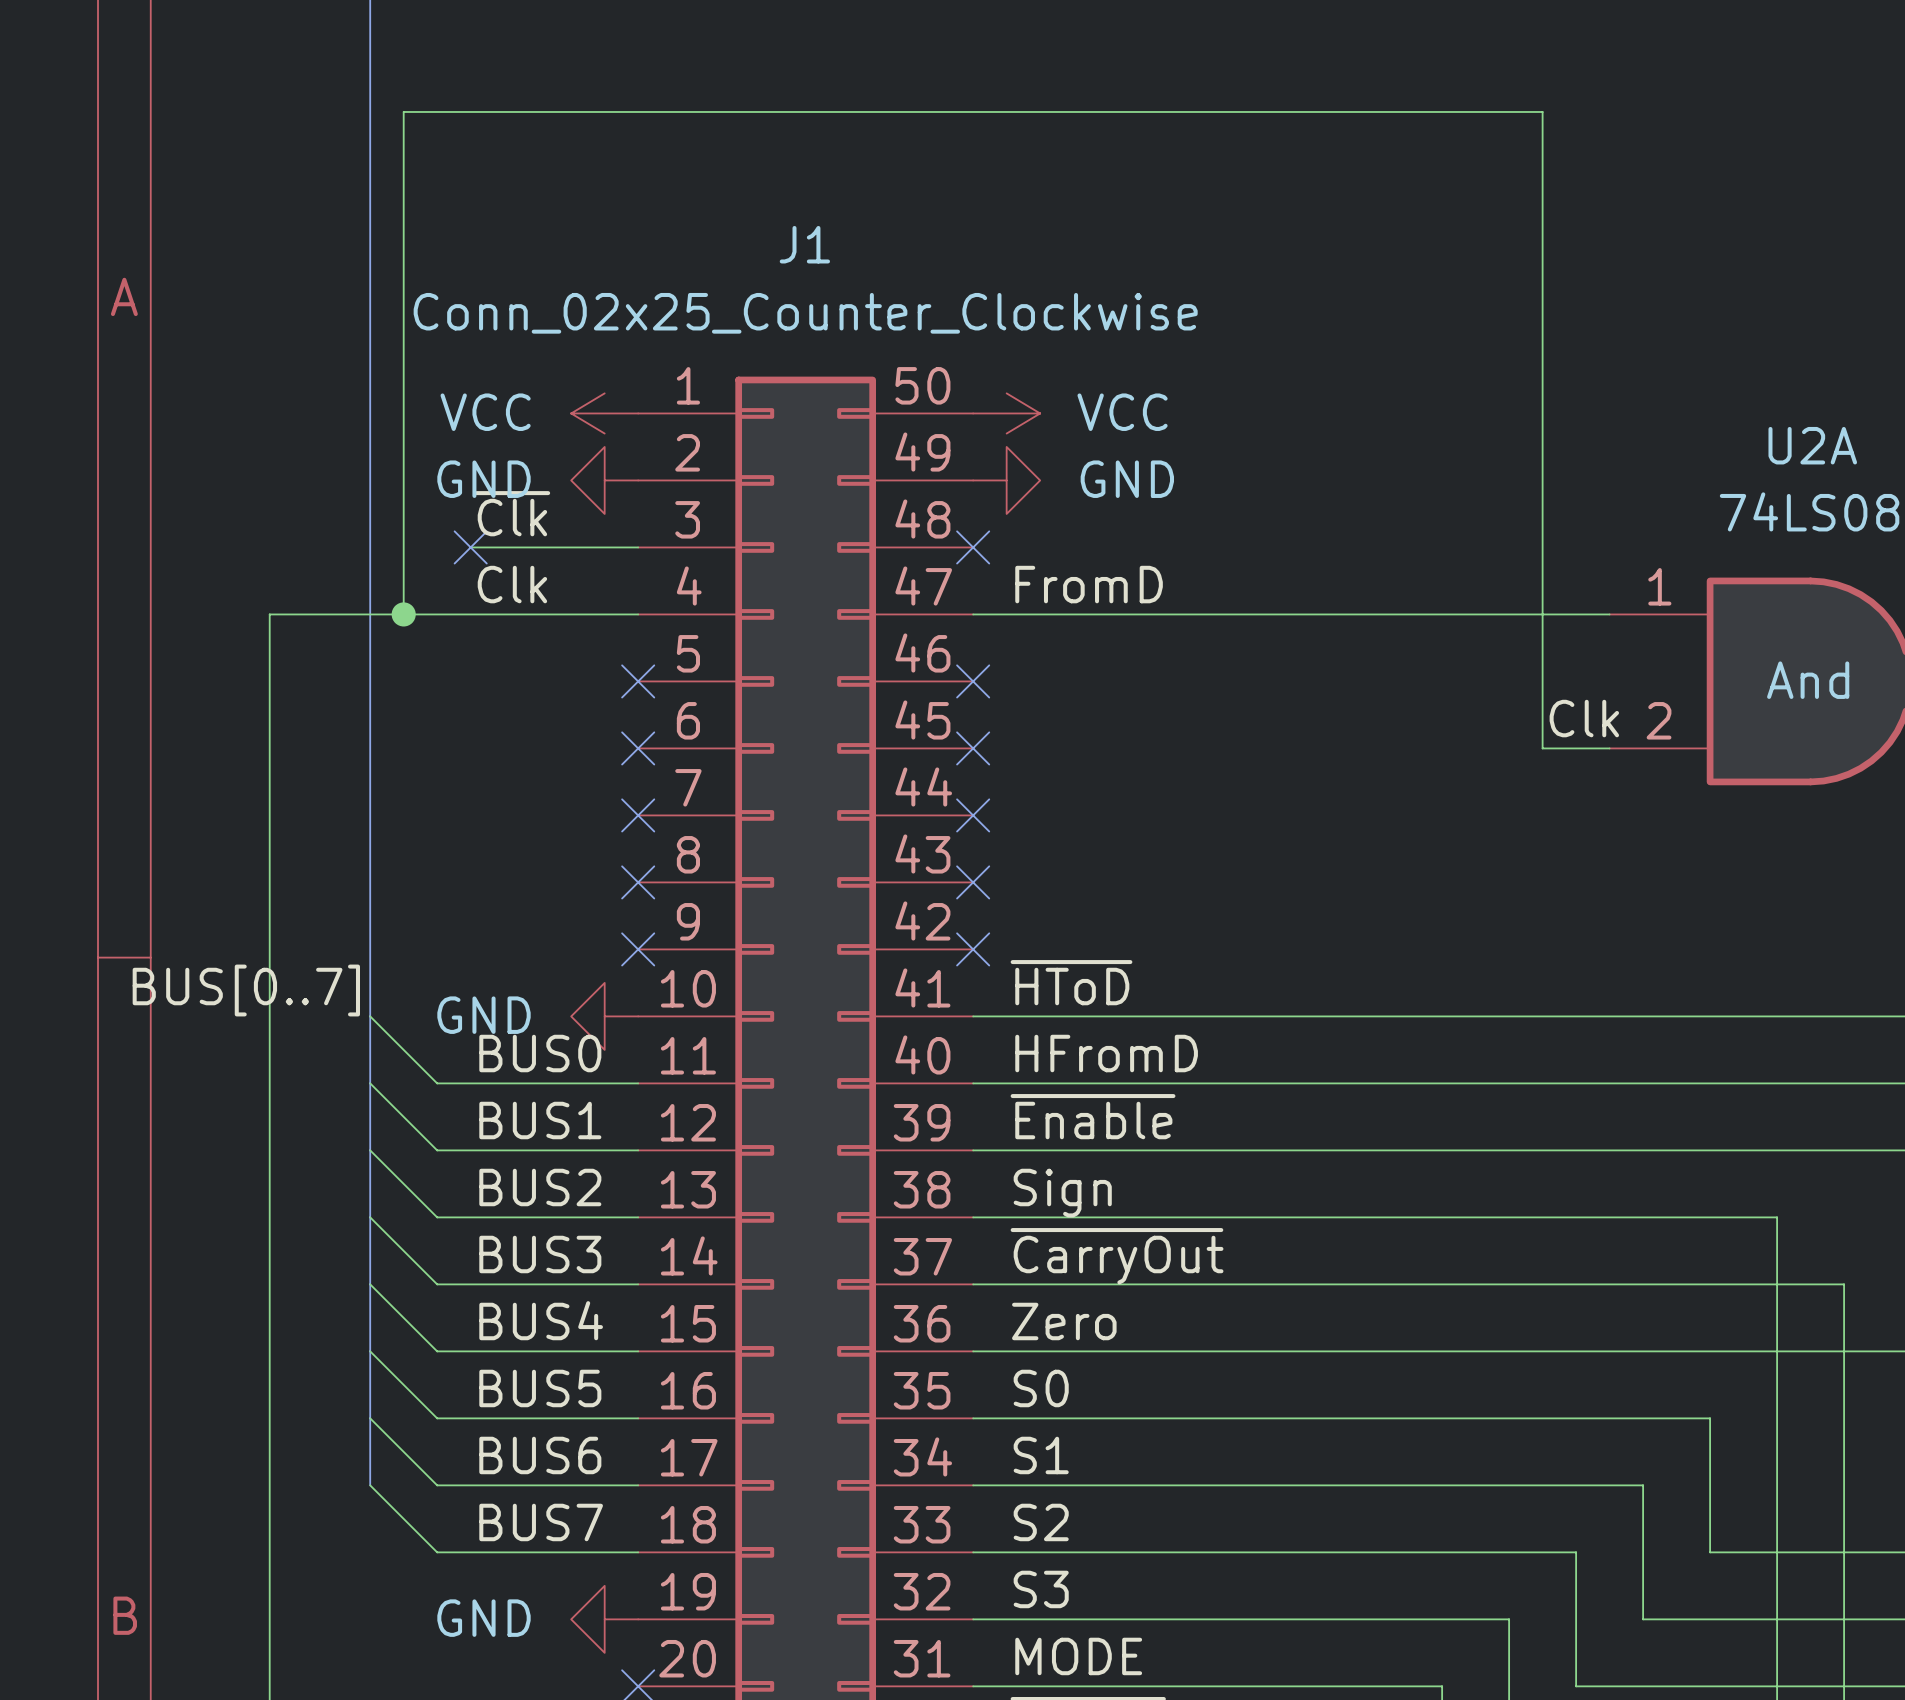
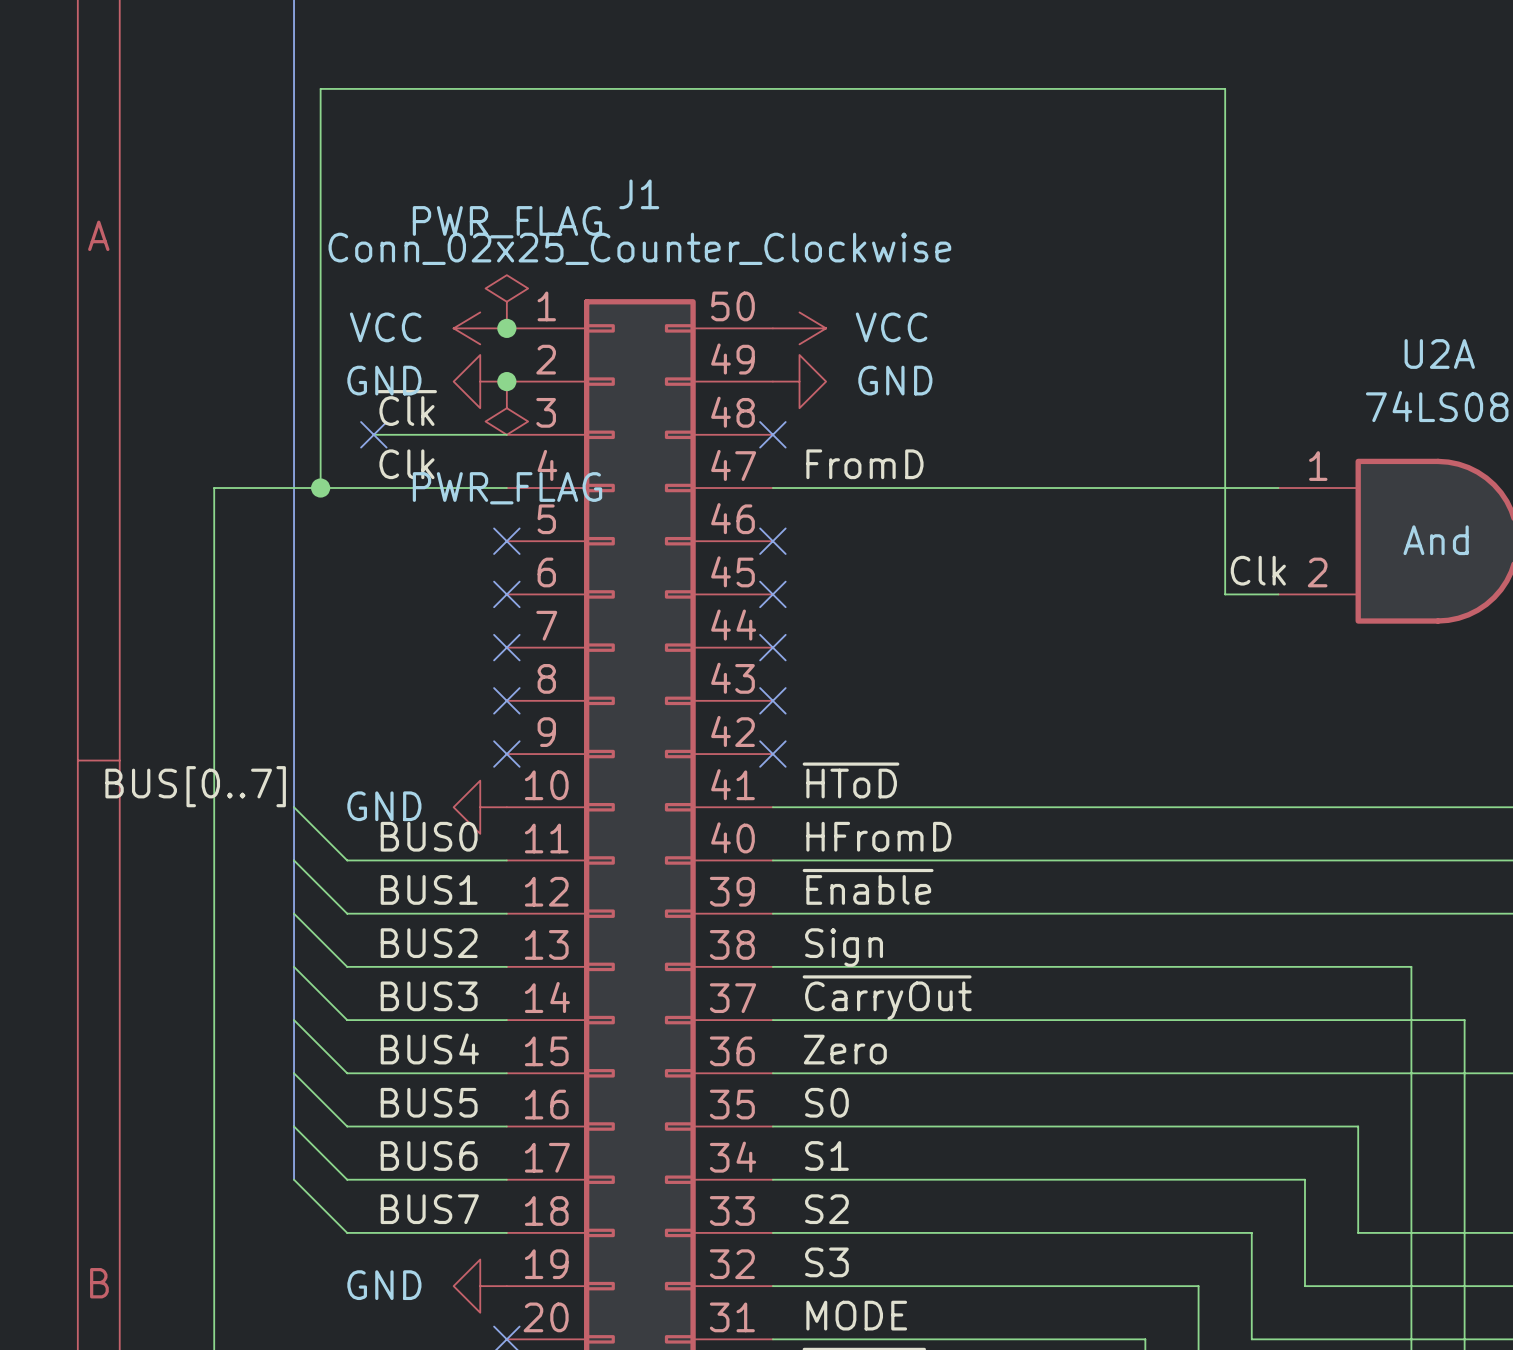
power symbol: none -> PWR_FLAG (506, 301)
junction: none -> (506, 328)
junction: none -> (506, 381)
power symbol: none -> PWR_FLAG (506, 408)

